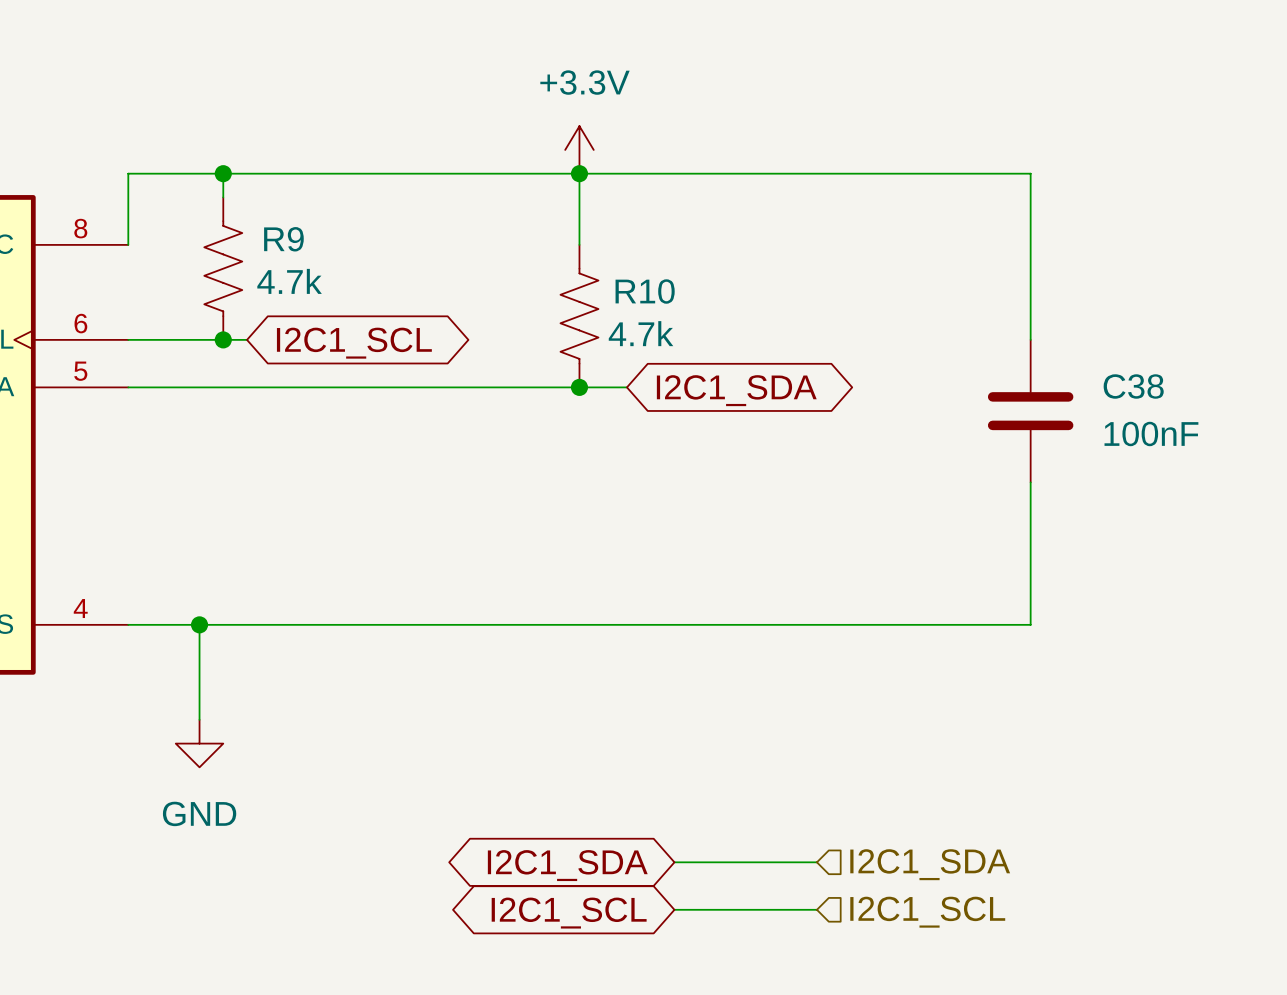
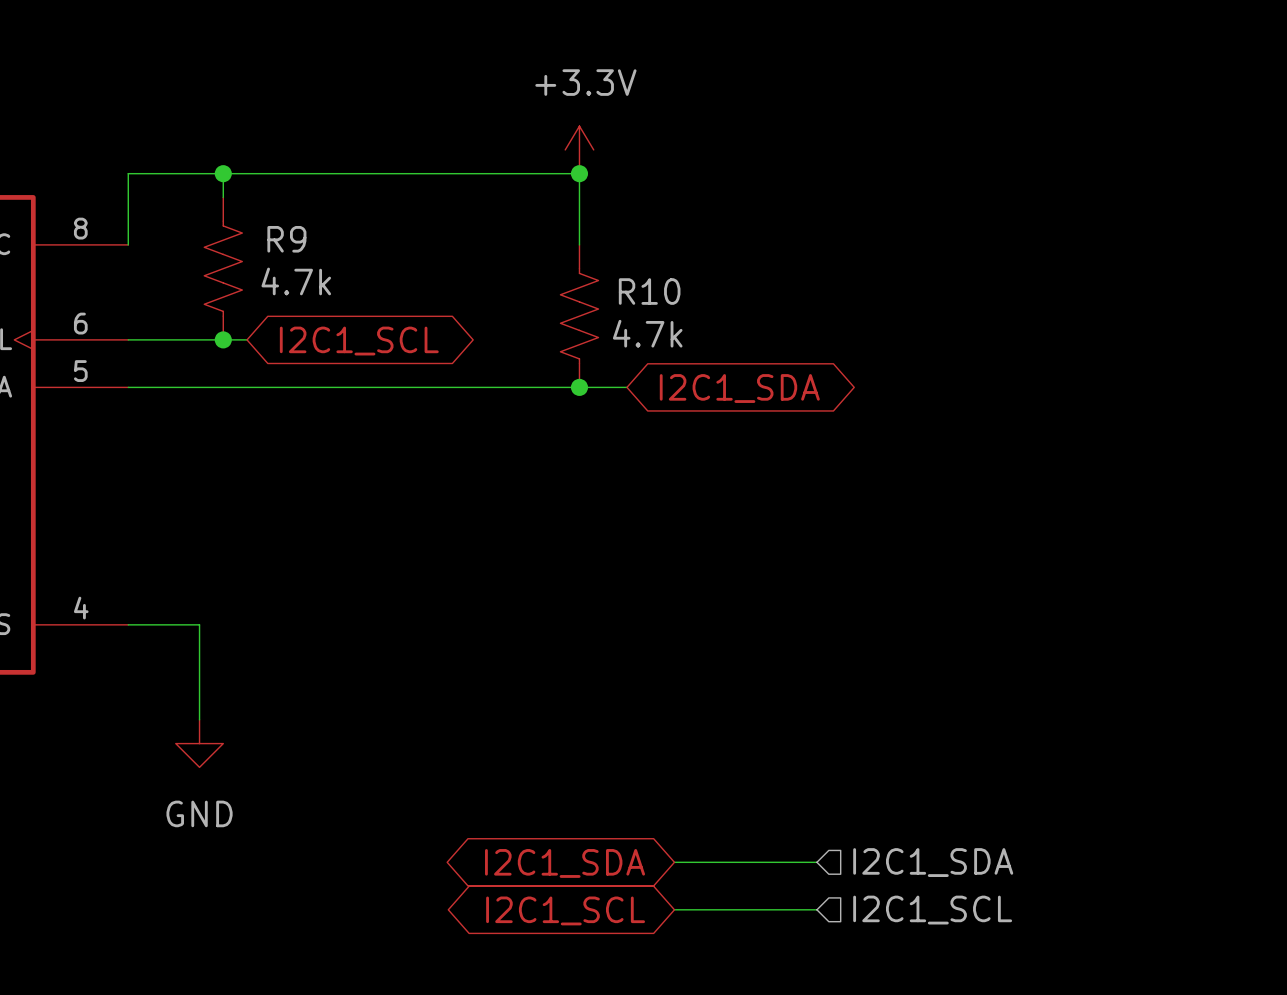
wire: (579, 173) (1030, 173) (1030, 339) -> none
C38: 100nF (1030, 411) -> none
wire: (1030, 482) (1030, 624) (199, 624) -> none
junction: (199, 624) -> none

